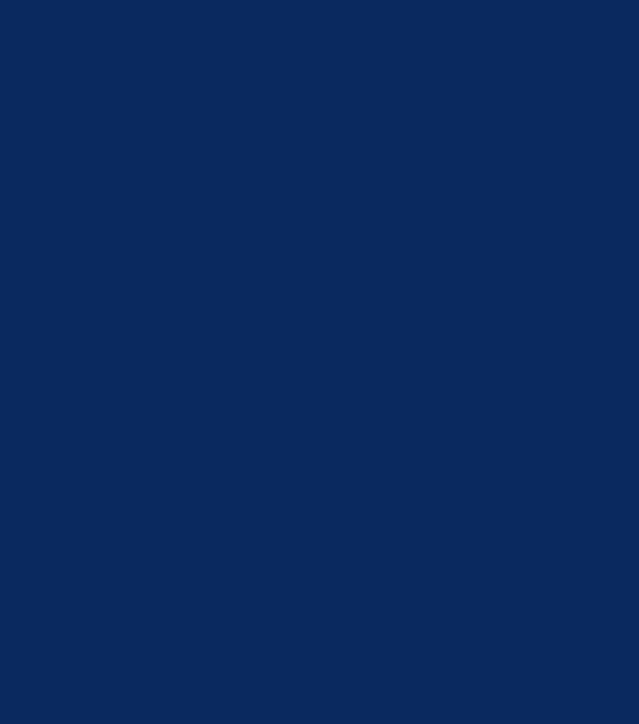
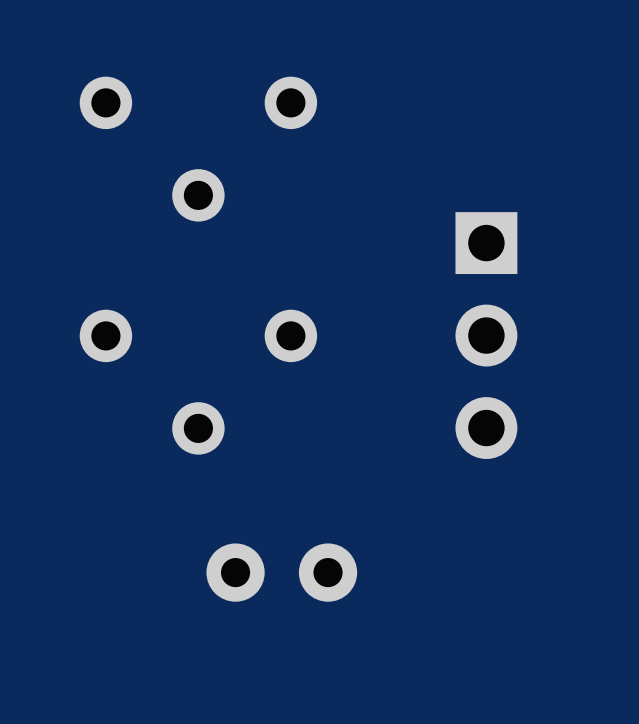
part: none -> (198, 149)
part: none -> (486, 335)
part: none -> (198, 382)
part: none -> (281, 572)

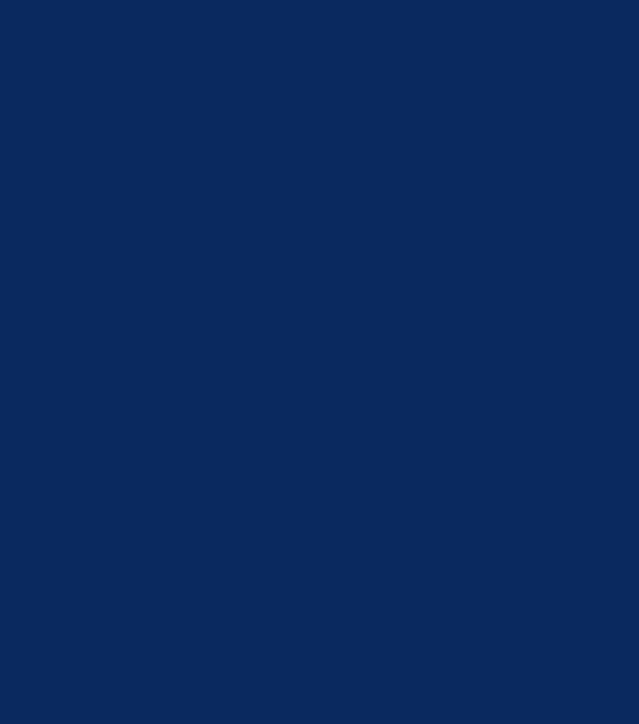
part: (198, 149) -> none
part: (486, 335) -> none
part: (198, 382) -> none
part: (281, 572) -> none

